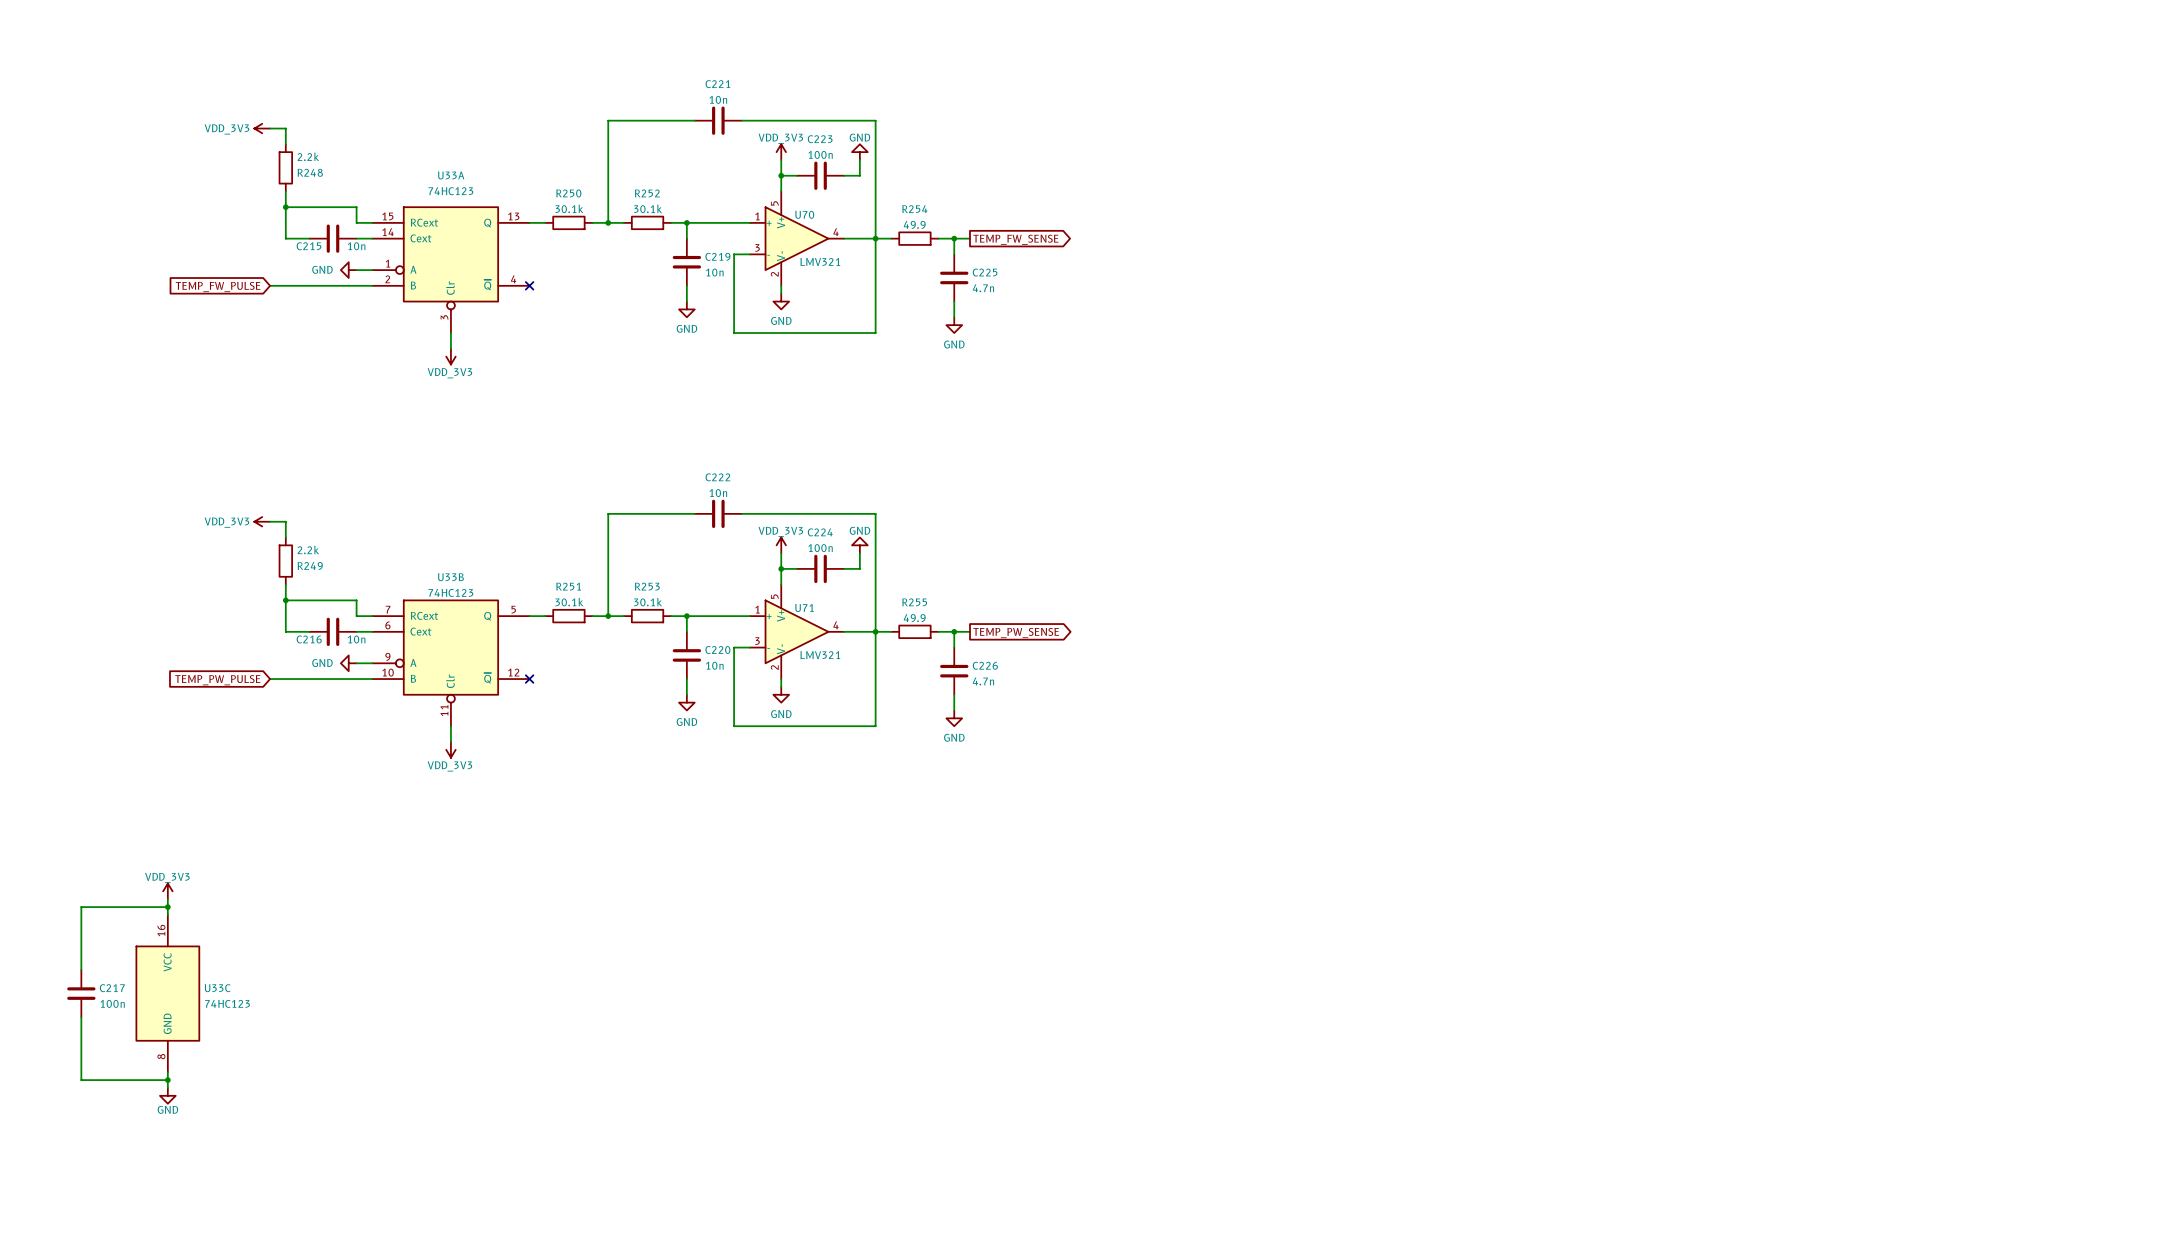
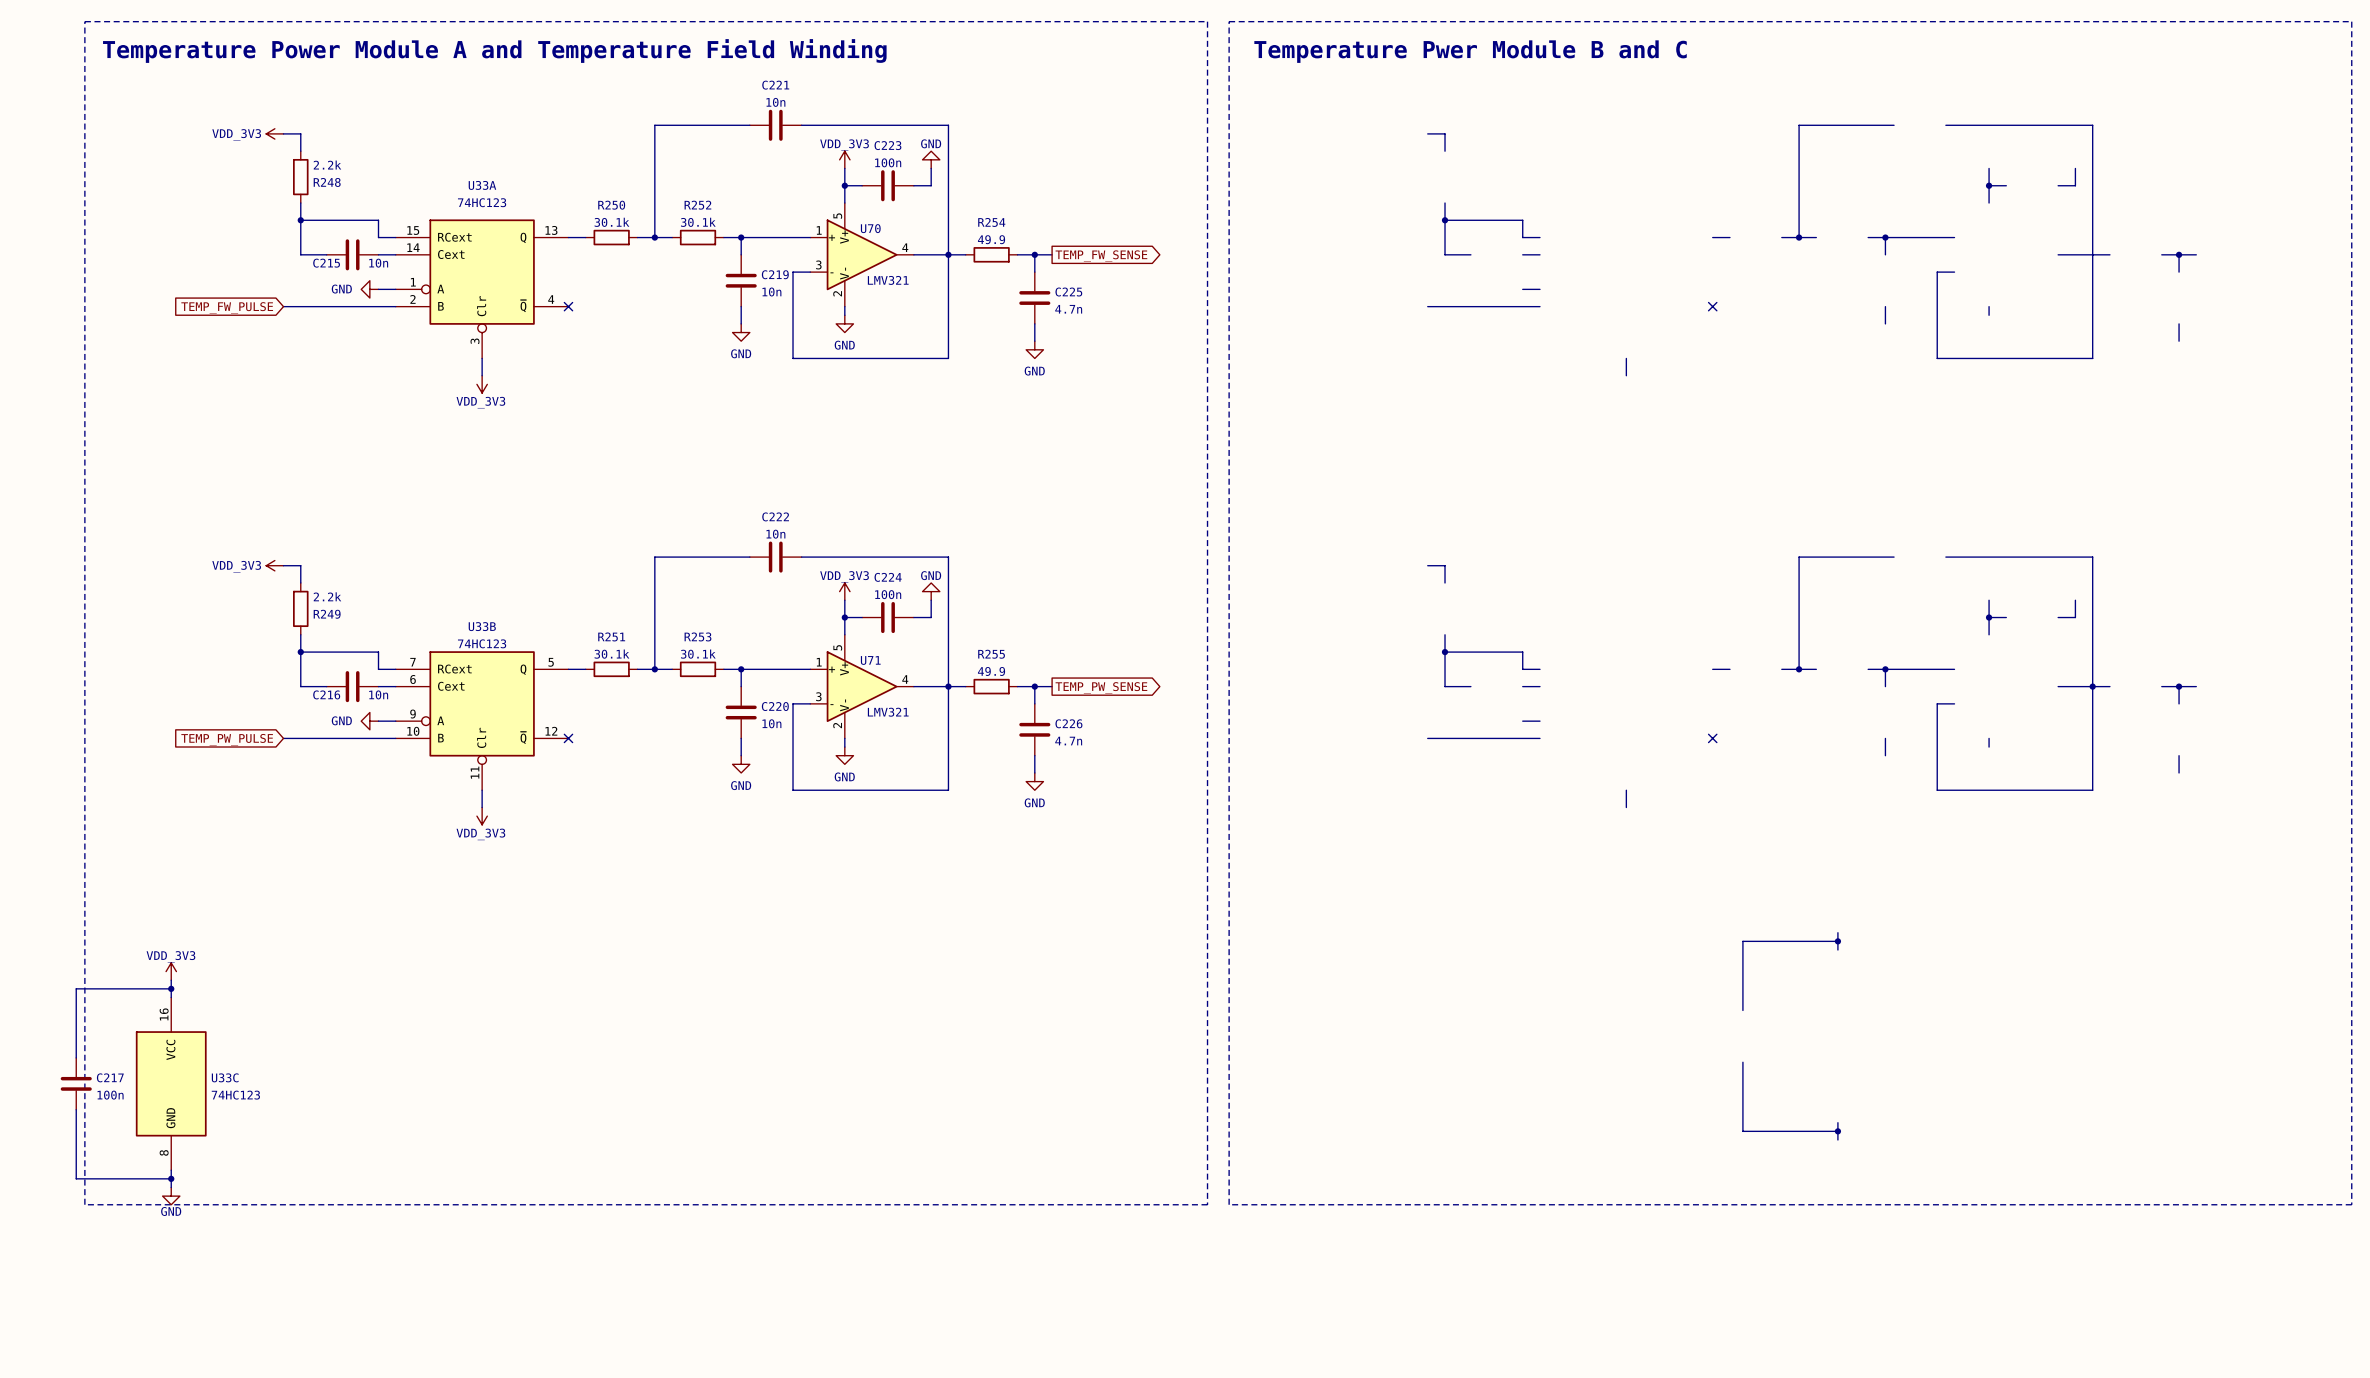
line: none -> (84, 21) (1207, 21) (1207, 1204) (84, 1204) (84, 21)
line: none -> (1229, 21) (2351, 21) (2351, 1204) (1229, 1204) (1229, 21)
text: none -> Temperature Power Module A and Temperature Field Winding (494, 51)
text: none -> Temperature Pwer Module B and C (1470, 51)
wire: none -> (1894, 125) (1799, 125) (1799, 237)
wire: none -> (1945, 125) (2092, 125) (2092, 358) (1937, 358) (1937, 272) (1954, 272)
wire: none -> (1427, 133) (1445, 133) (1445, 151)
wire: none -> (1989, 168) (1989, 203)
wire: none -> (2075, 168) (2075, 185) (2058, 185)
wire: none -> (1989, 185) (2006, 185)
junction: none -> (1989, 185)
wire: none -> (1445, 203) (1445, 254) (1470, 254)
wire: none -> (1445, 220) (1522, 220) (1522, 237) (1539, 237)
junction: none -> (1445, 220)
wire: none -> (1712, 237) (1729, 237)
wire: none -> (1781, 237) (1816, 237)
junction: none -> (1799, 237)
wire: none -> (1868, 237) (1954, 237)
wire: none -> (1885, 237) (1885, 254)
junction: none -> (1885, 237)
wire: none -> (1522, 254) (1539, 254)
wire: none -> (2058, 254) (2109, 254)
wire: none -> (2161, 254) (2196, 254)
wire: none -> (2179, 254) (2179, 272)
junction: none -> (2179, 254)
wire: none -> (1522, 289) (1539, 289)
wire: none -> (1427, 306) (1539, 306)
no-connect mark: none -> (1712, 306)
wire: none -> (1885, 306) (1885, 323)
wire: none -> (1989, 306) (1989, 315)
wire: none -> (2179, 323) (2179, 341)
wire: none -> (1626, 358) (1626, 375)
wire: none -> (1894, 557) (1799, 557) (1799, 669)
wire: none -> (1945, 557) (2092, 557) (2092, 790) (1937, 790) (1937, 703) (1954, 703)
wire: none -> (1427, 565) (1445, 565) (1445, 582)
wire: none -> (1989, 600) (1989, 634)
wire: none -> (2075, 600) (2075, 617) (2058, 617)
wire: none -> (1989, 617) (2006, 617)
junction: none -> (1989, 617)
wire: none -> (1445, 634) (1445, 686) (1470, 686)
wire: none -> (1445, 652) (1522, 652) (1522, 669) (1539, 669)
junction: none -> (1445, 652)
wire: none -> (1712, 669) (1729, 669)
wire: none -> (1781, 669) (1816, 669)
junction: none -> (1799, 669)
wire: none -> (1868, 669) (1954, 669)
wire: none -> (1885, 669) (1885, 686)
junction: none -> (1885, 669)
wire: none -> (1522, 686) (1539, 686)
wire: none -> (2058, 686) (2109, 686)
junction: none -> (2092, 686)
wire: none -> (2161, 686) (2196, 686)
wire: none -> (2179, 686) (2179, 703)
junction: none -> (2179, 686)
wire: none -> (1522, 721) (1539, 721)
wire: none -> (1427, 738) (1539, 738)
no-connect mark: none -> (1712, 738)
wire: none -> (1885, 738) (1885, 755)
wire: none -> (1989, 738) (1989, 747)
wire: none -> (2179, 755) (2179, 772)
wire: none -> (1626, 790) (1626, 807)
wire: none -> (1837, 932) (1837, 950)
wire: none -> (1837, 941) (1742, 941) (1742, 1010)
junction: none -> (1837, 941)
wire: none -> (1742, 1062) (1742, 1131) (1837, 1131)
wire: none -> (1837, 1122) (1837, 1139)
junction: none -> (1837, 1131)

